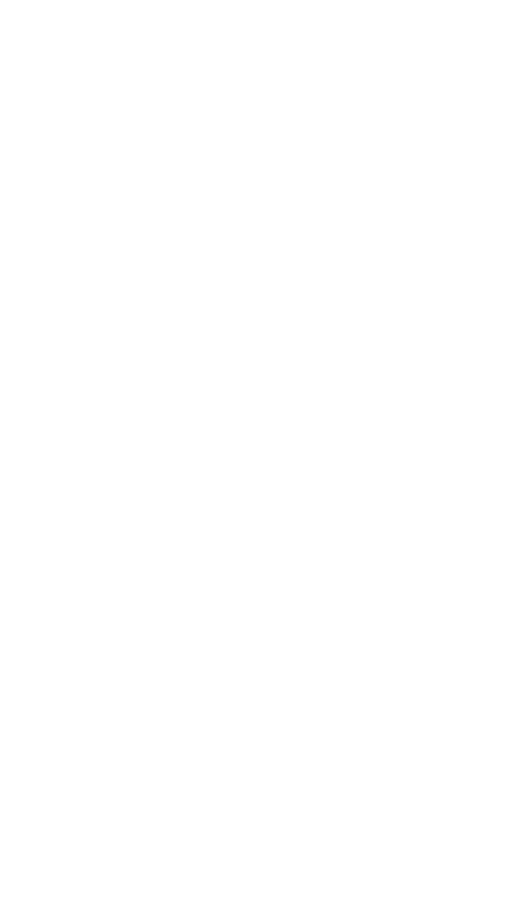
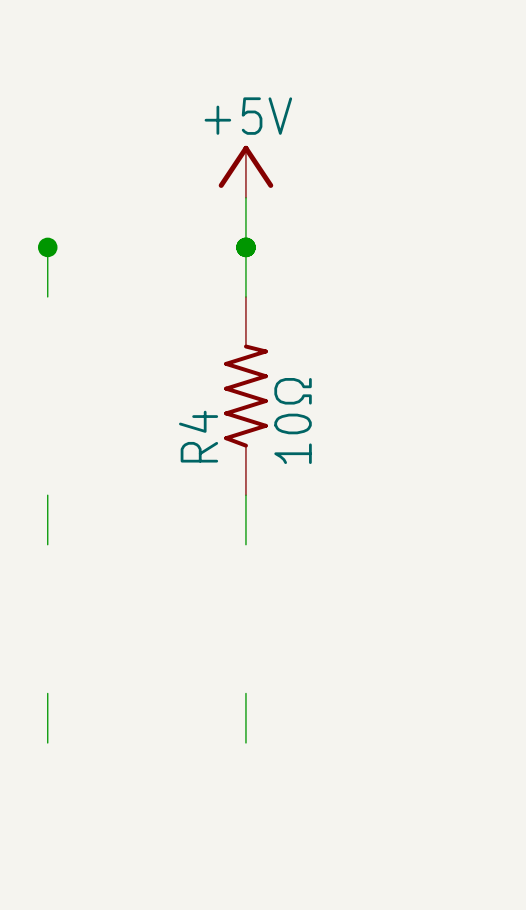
power symbol: none -> +5V (245, 171)
wire: none -> (245, 197) (245, 296)
wire: none -> (47, 247) (47, 296)
junction: none -> (47, 247)
junction: none -> (245, 247)
R4: none -> 10Ω (245, 396)
wire: none -> (47, 495) (47, 544)
wire: none -> (245, 495) (245, 544)
wire: none -> (47, 693) (47, 742)
wire: none -> (245, 693) (245, 742)

